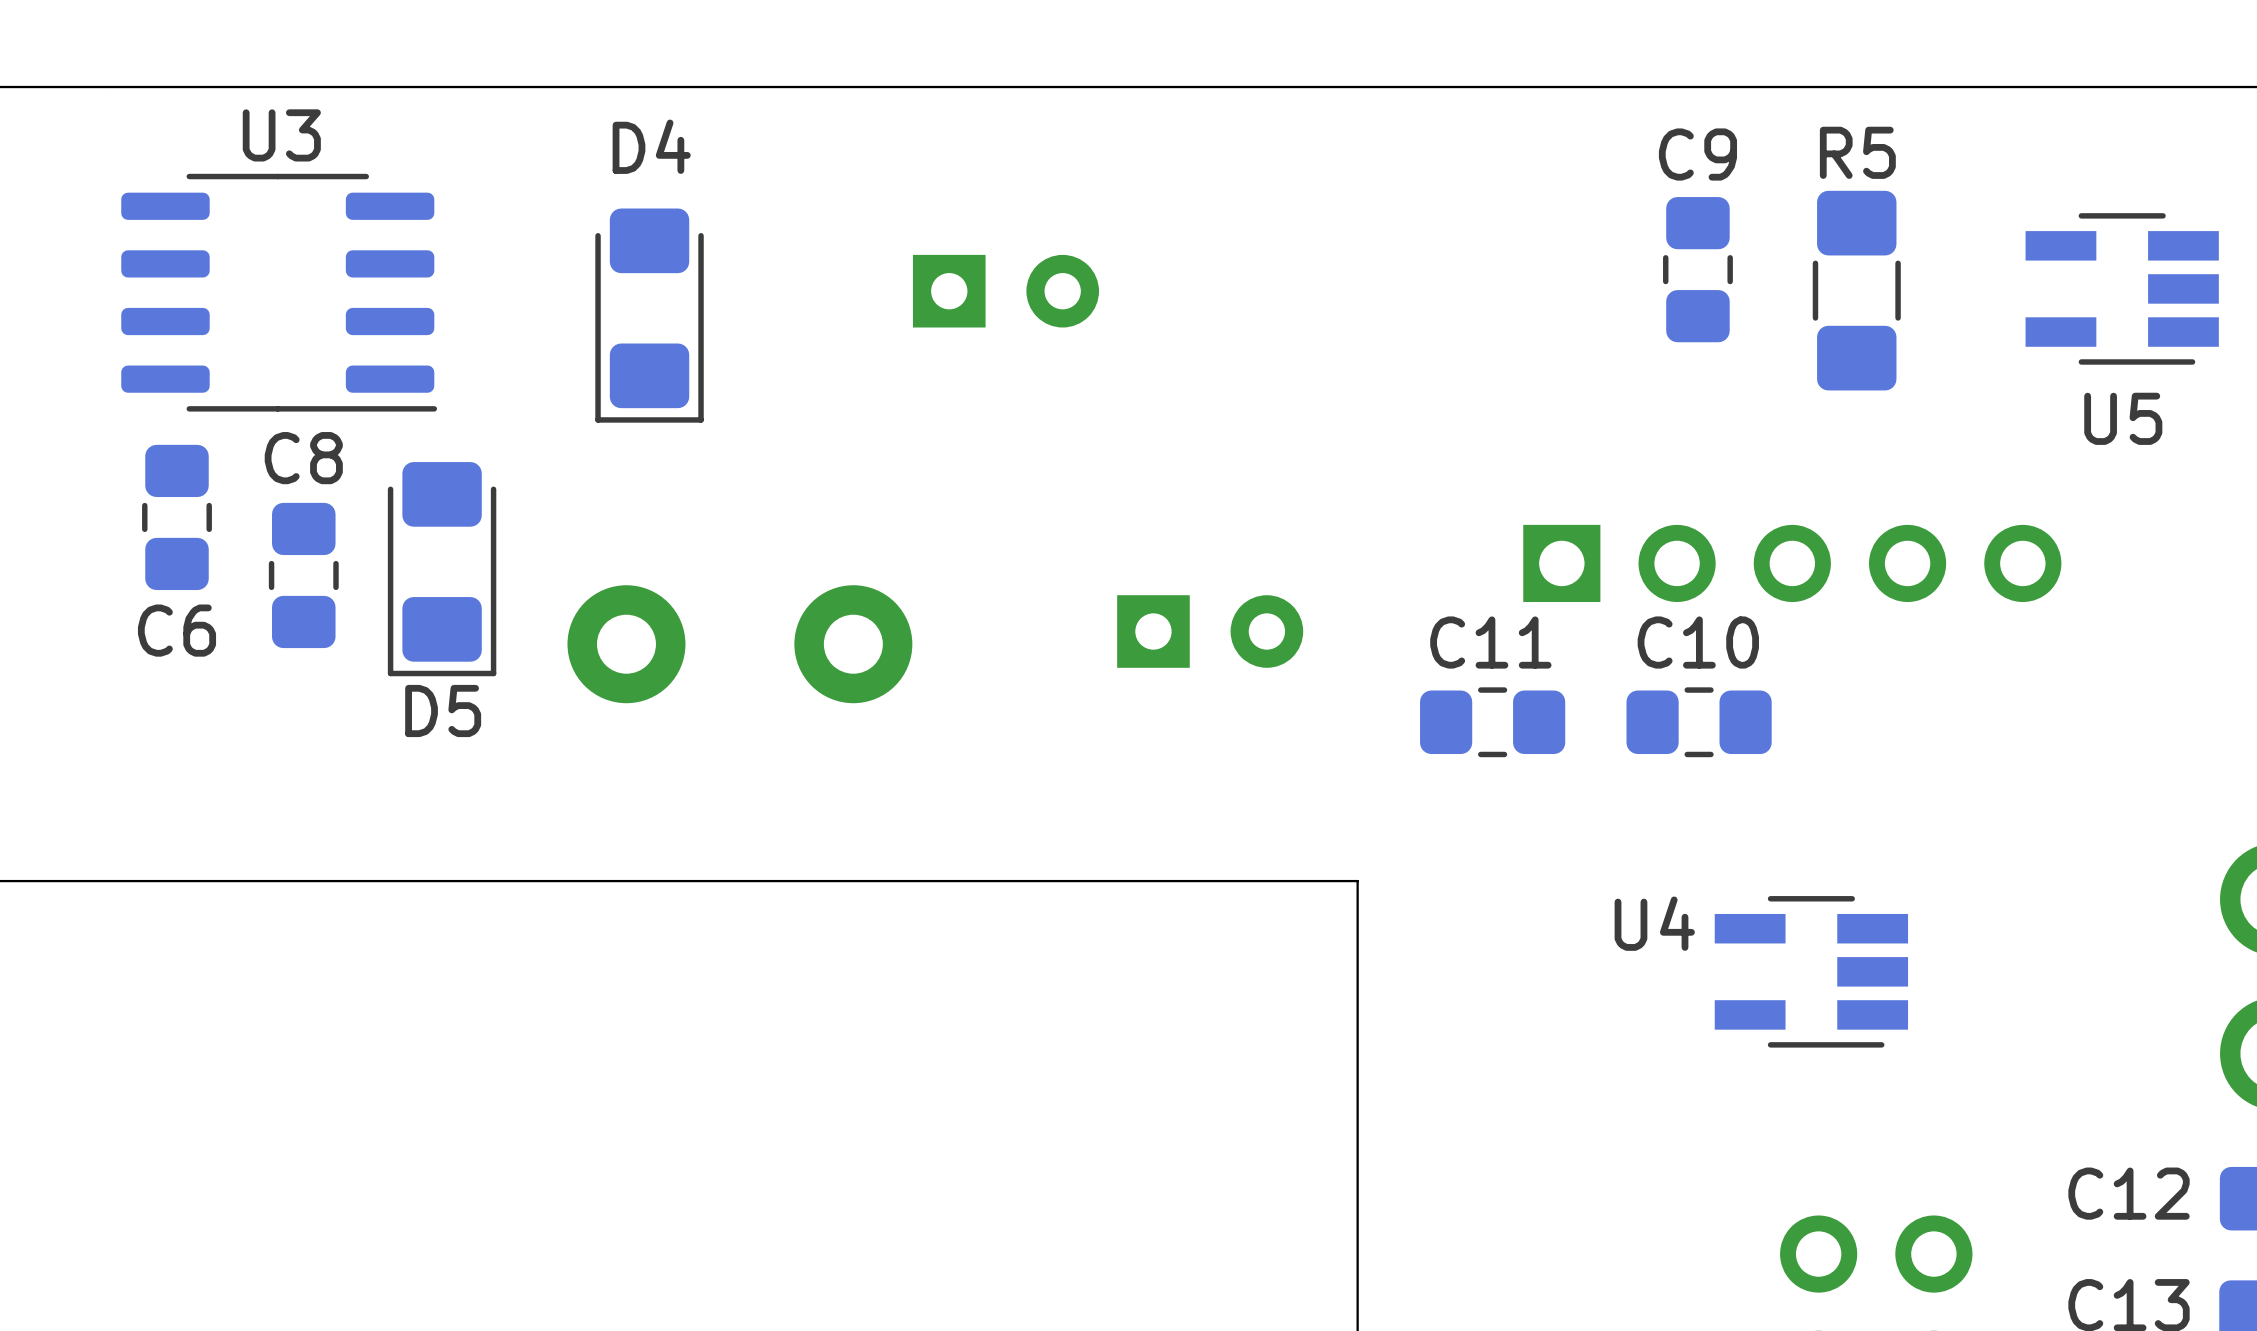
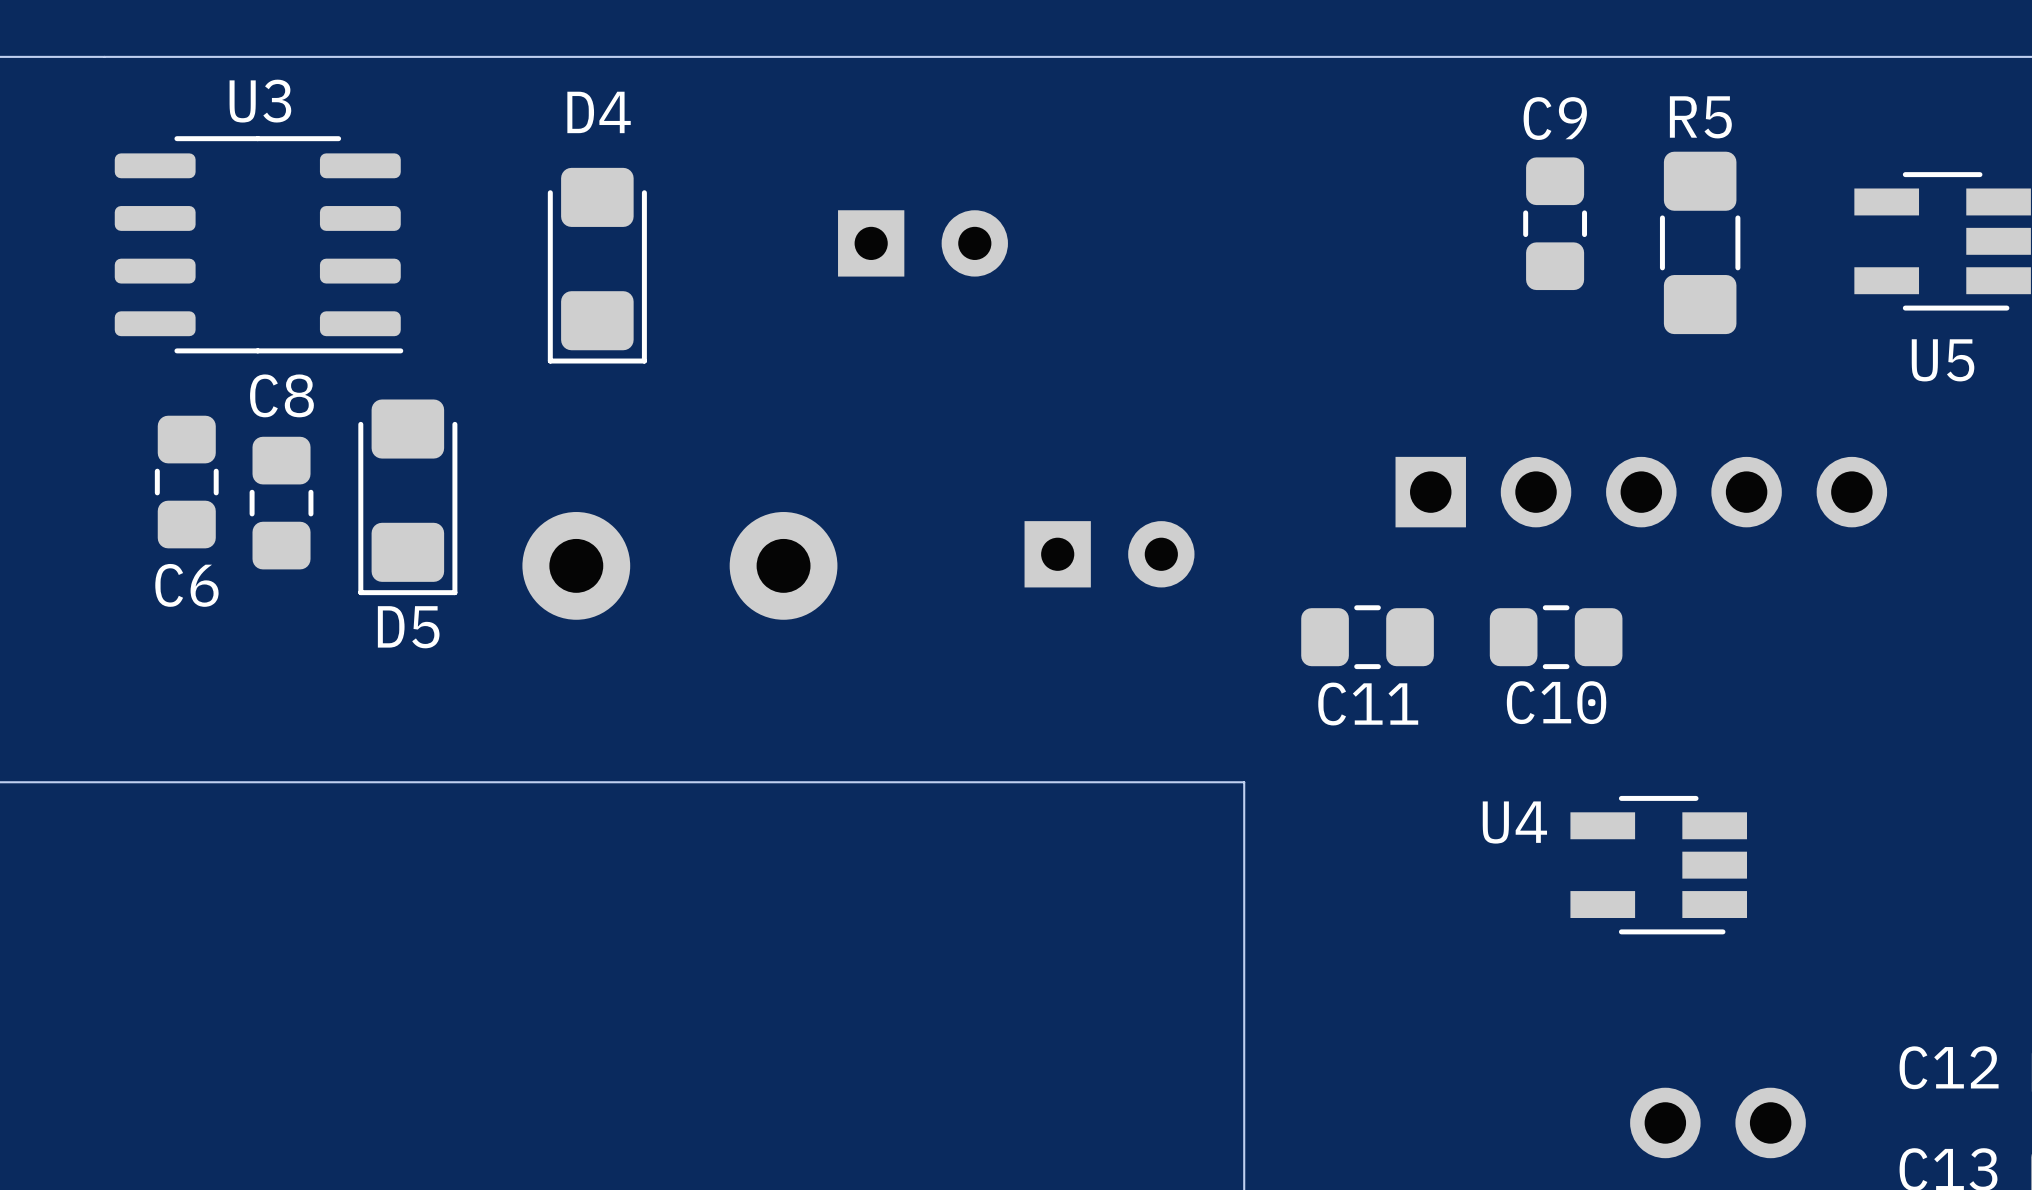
C6 position: (176, 517) -> (186, 482)
C11 name position: C11 (1490, 642) -> C11 (1368, 704)
C10 name position: C10 (1698, 642) -> C10 (1556, 702)

